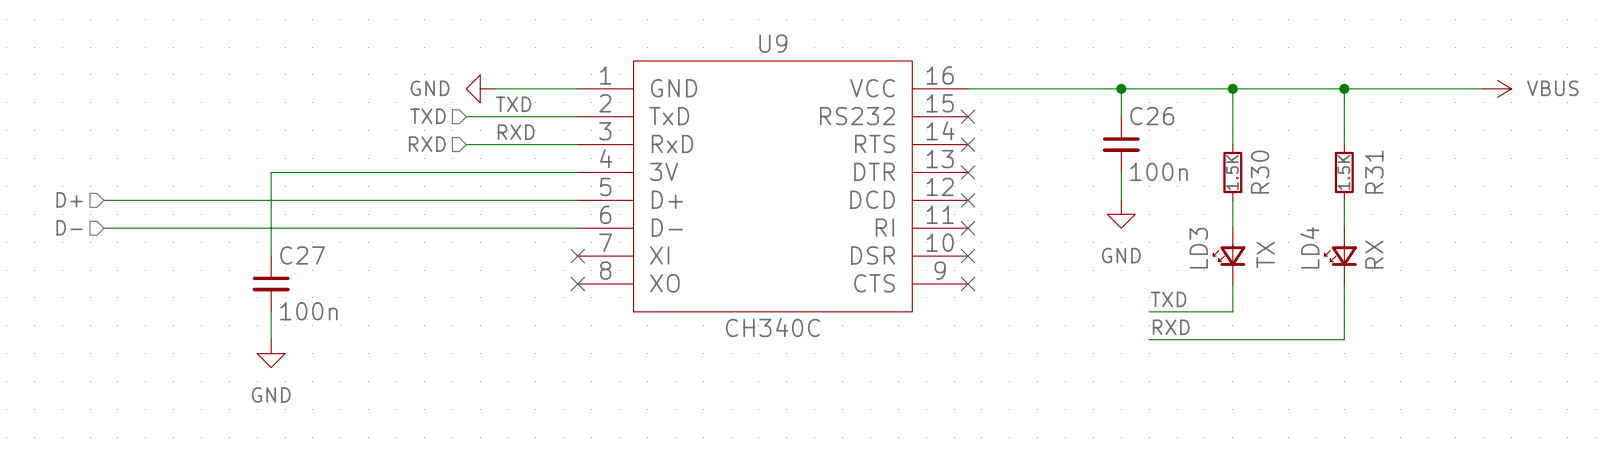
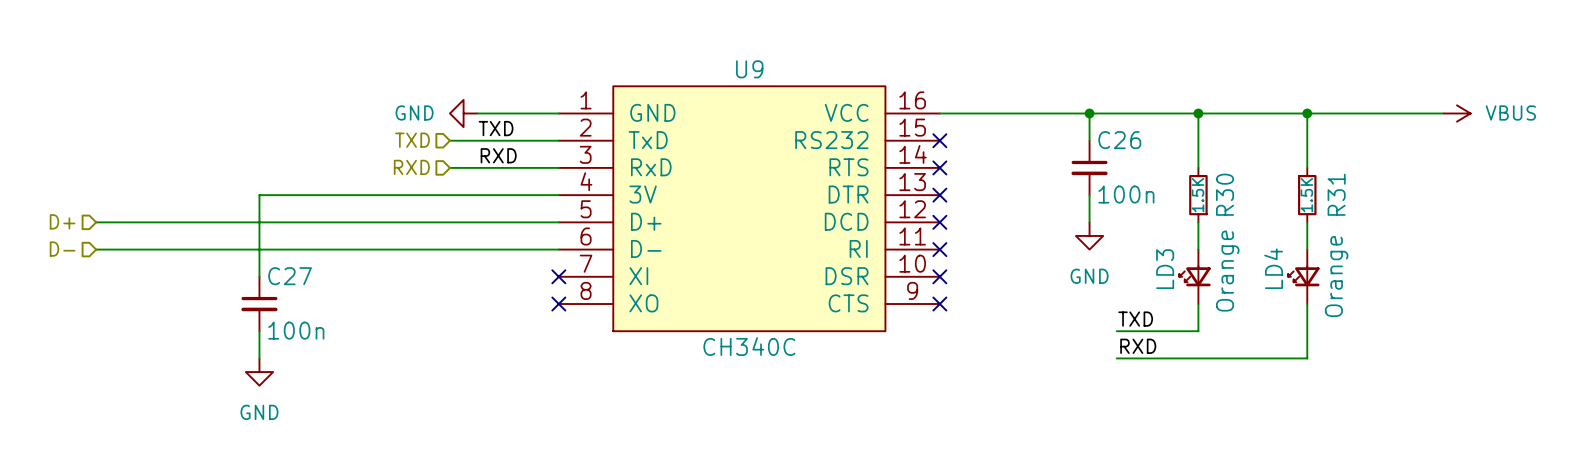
LD4 value: RX (1374, 254) -> Orange (1336, 276)
LD3 value: TX (1265, 255) -> Orange (1227, 271)

